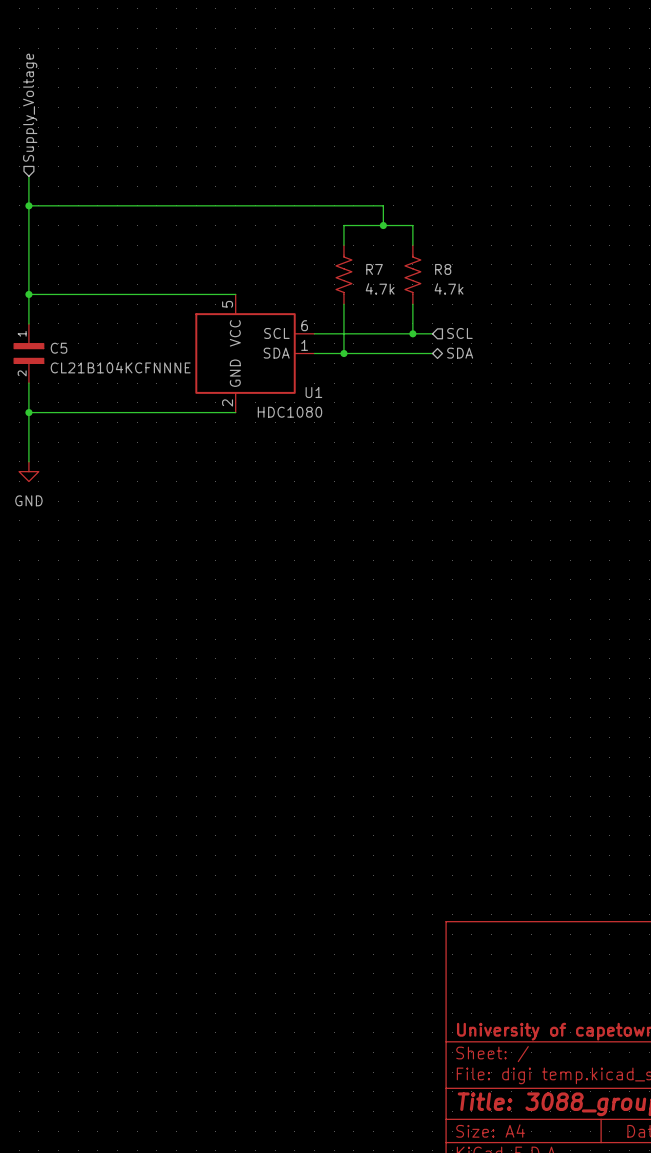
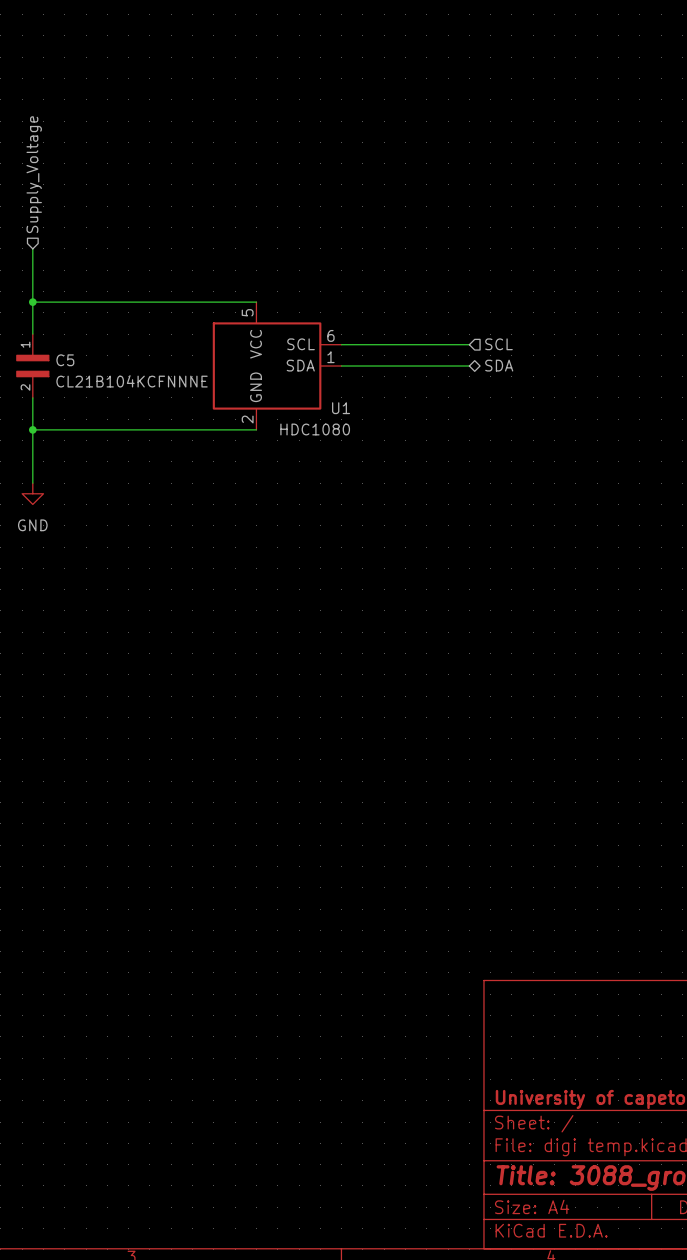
hierarchical label position: Supply_Voltage (30, 107) -> Supply_Voltage (34, 174)
wire: (28, 176) (28, 245) -> none
wire: (28, 205) (383, 205) (383, 225) -> none
junction: (28, 205) -> none
junction: (383, 225) -> none
wire: (343, 245) (343, 225) (412, 225) (412, 245) -> none
R7: 4.7k (343, 274) -> none
R8: 4.7k (412, 274) -> none
wire: (343, 304) (343, 353) -> none
wire: (412, 304) (412, 333) -> none
junction: (412, 333) -> none
junction: (343, 353) -> none

